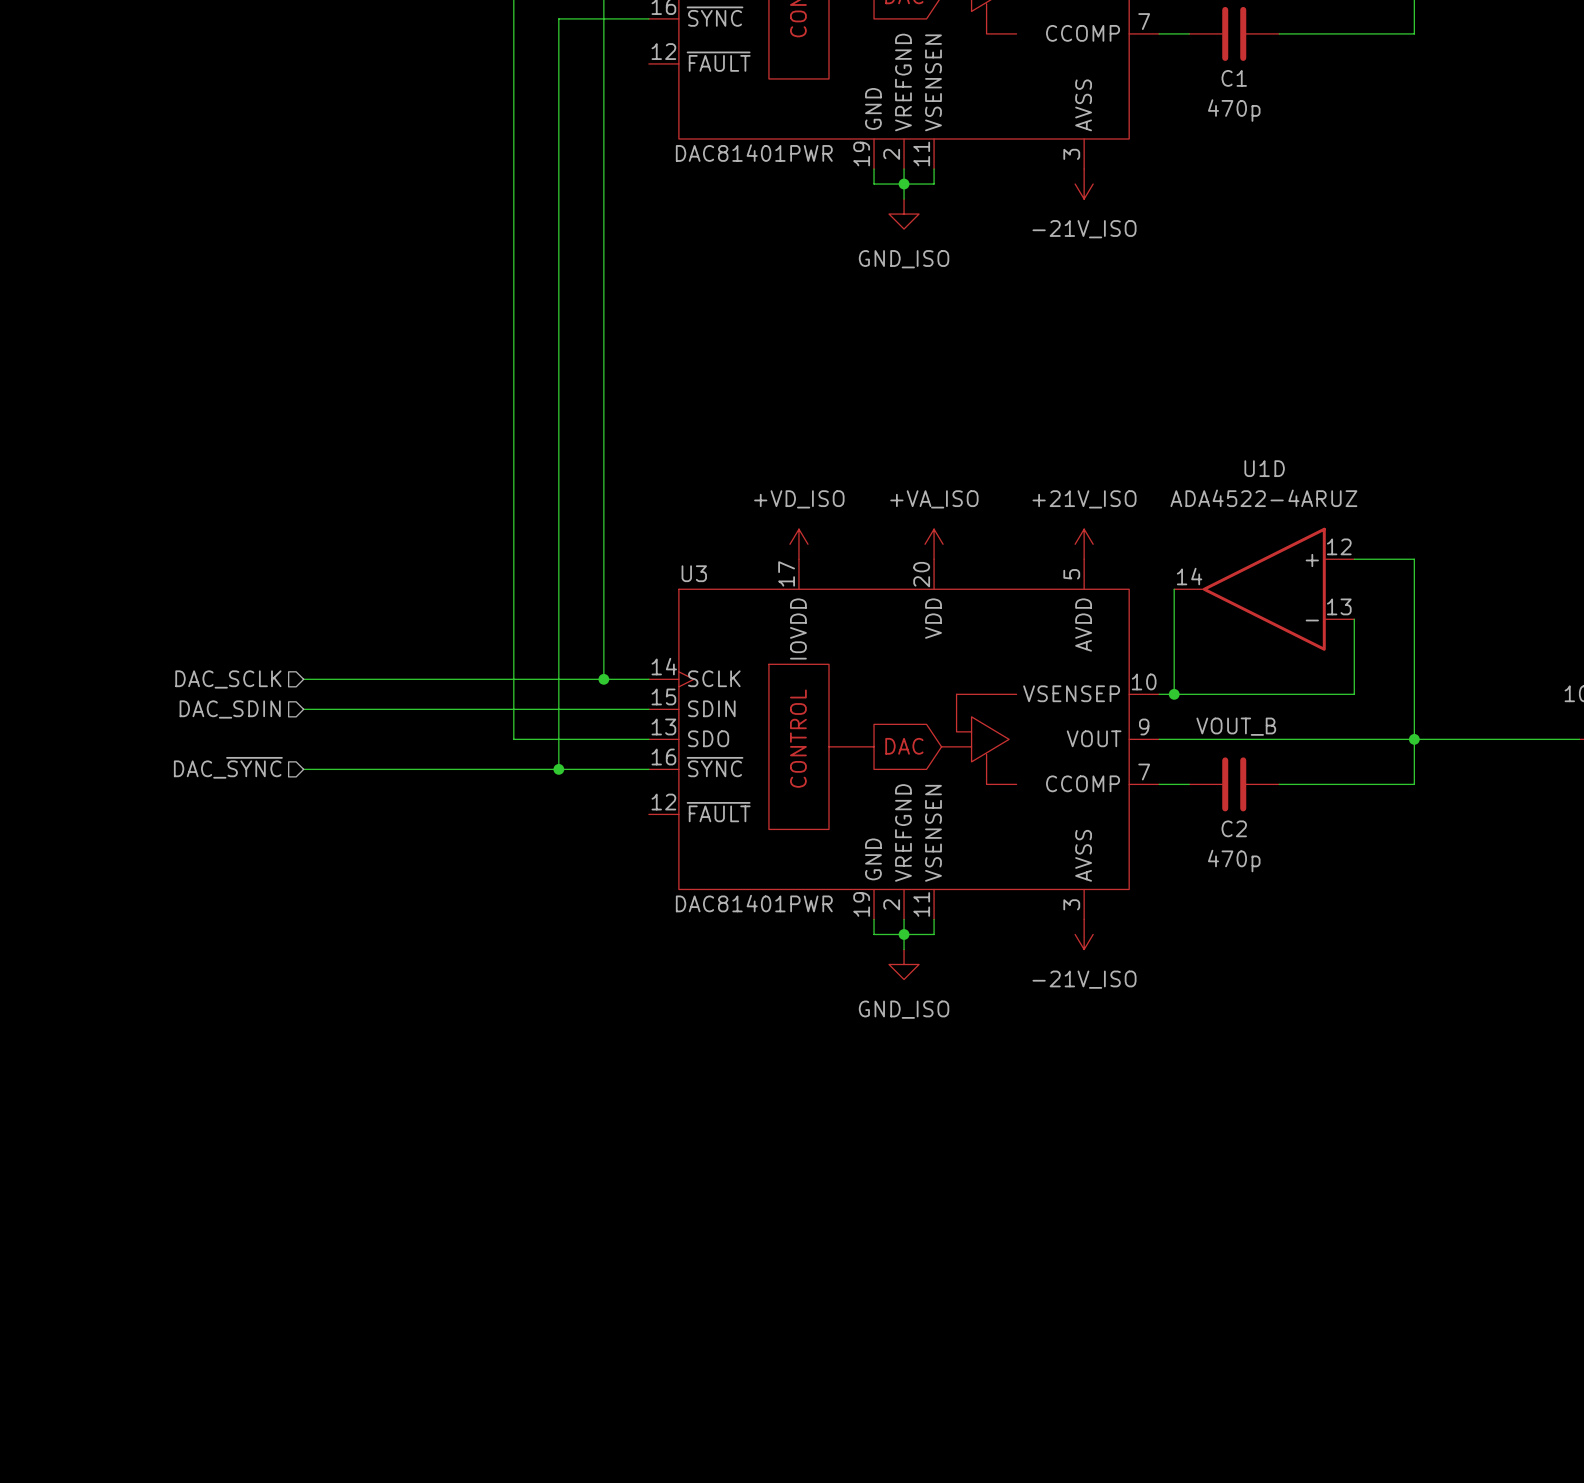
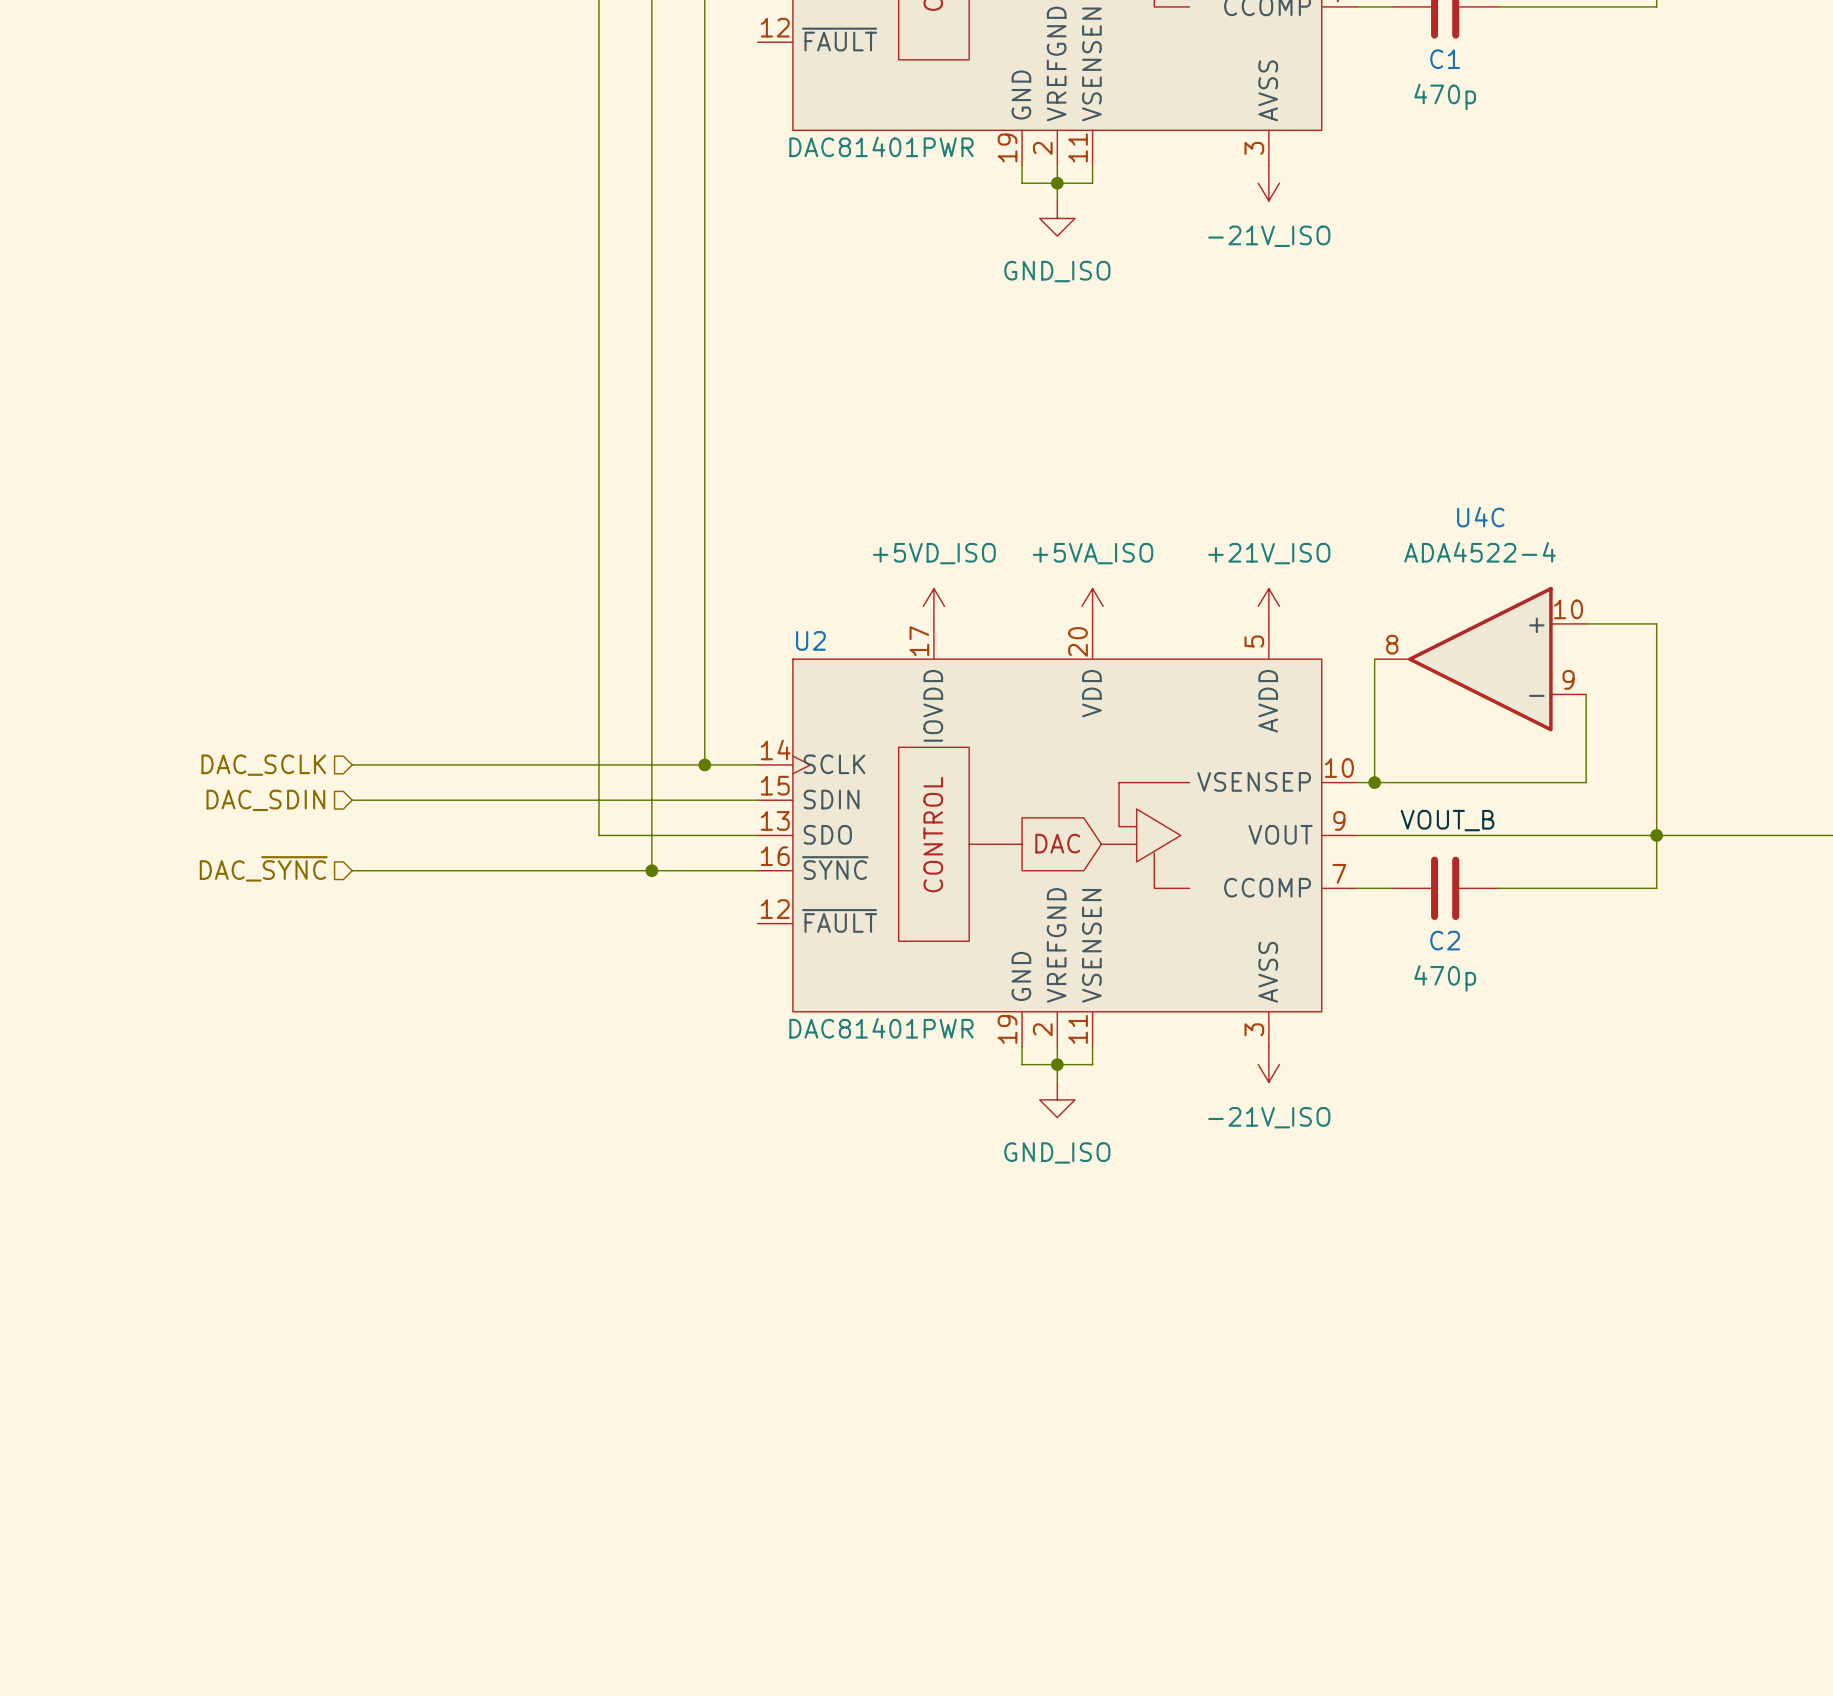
U1D name: U1D (1264, 468) -> U4C (1480, 517)
U1D value: ADA4522-4ARUZ (1263, 498) -> ADA4522-4 (1479, 552)
power symbol: +VD_ISO (798, 544) -> +5VD_ISO (933, 606)
power symbol: +VA_ISO (934, 544) -> +5VA_ISO (1092, 606)
U1D pin number: 12 (1339, 546) -> 10 (1568, 609)
U3 name: U3 (694, 573) -> U2 (810, 640)
U1D pin number: 14 (1189, 576) -> 8 (1392, 644)
U1D pin number: 13 (1339, 606) -> 9 (1568, 679)

